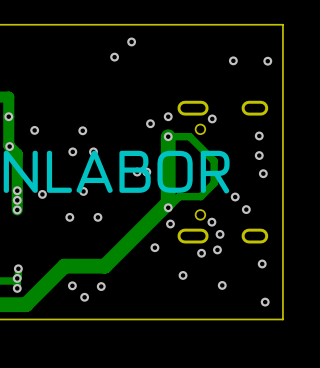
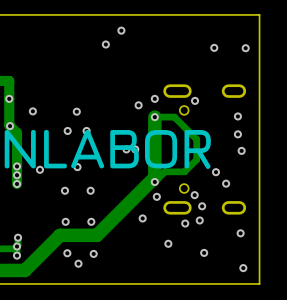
via: none -> (65, 221)
via: none -> (91, 221)

